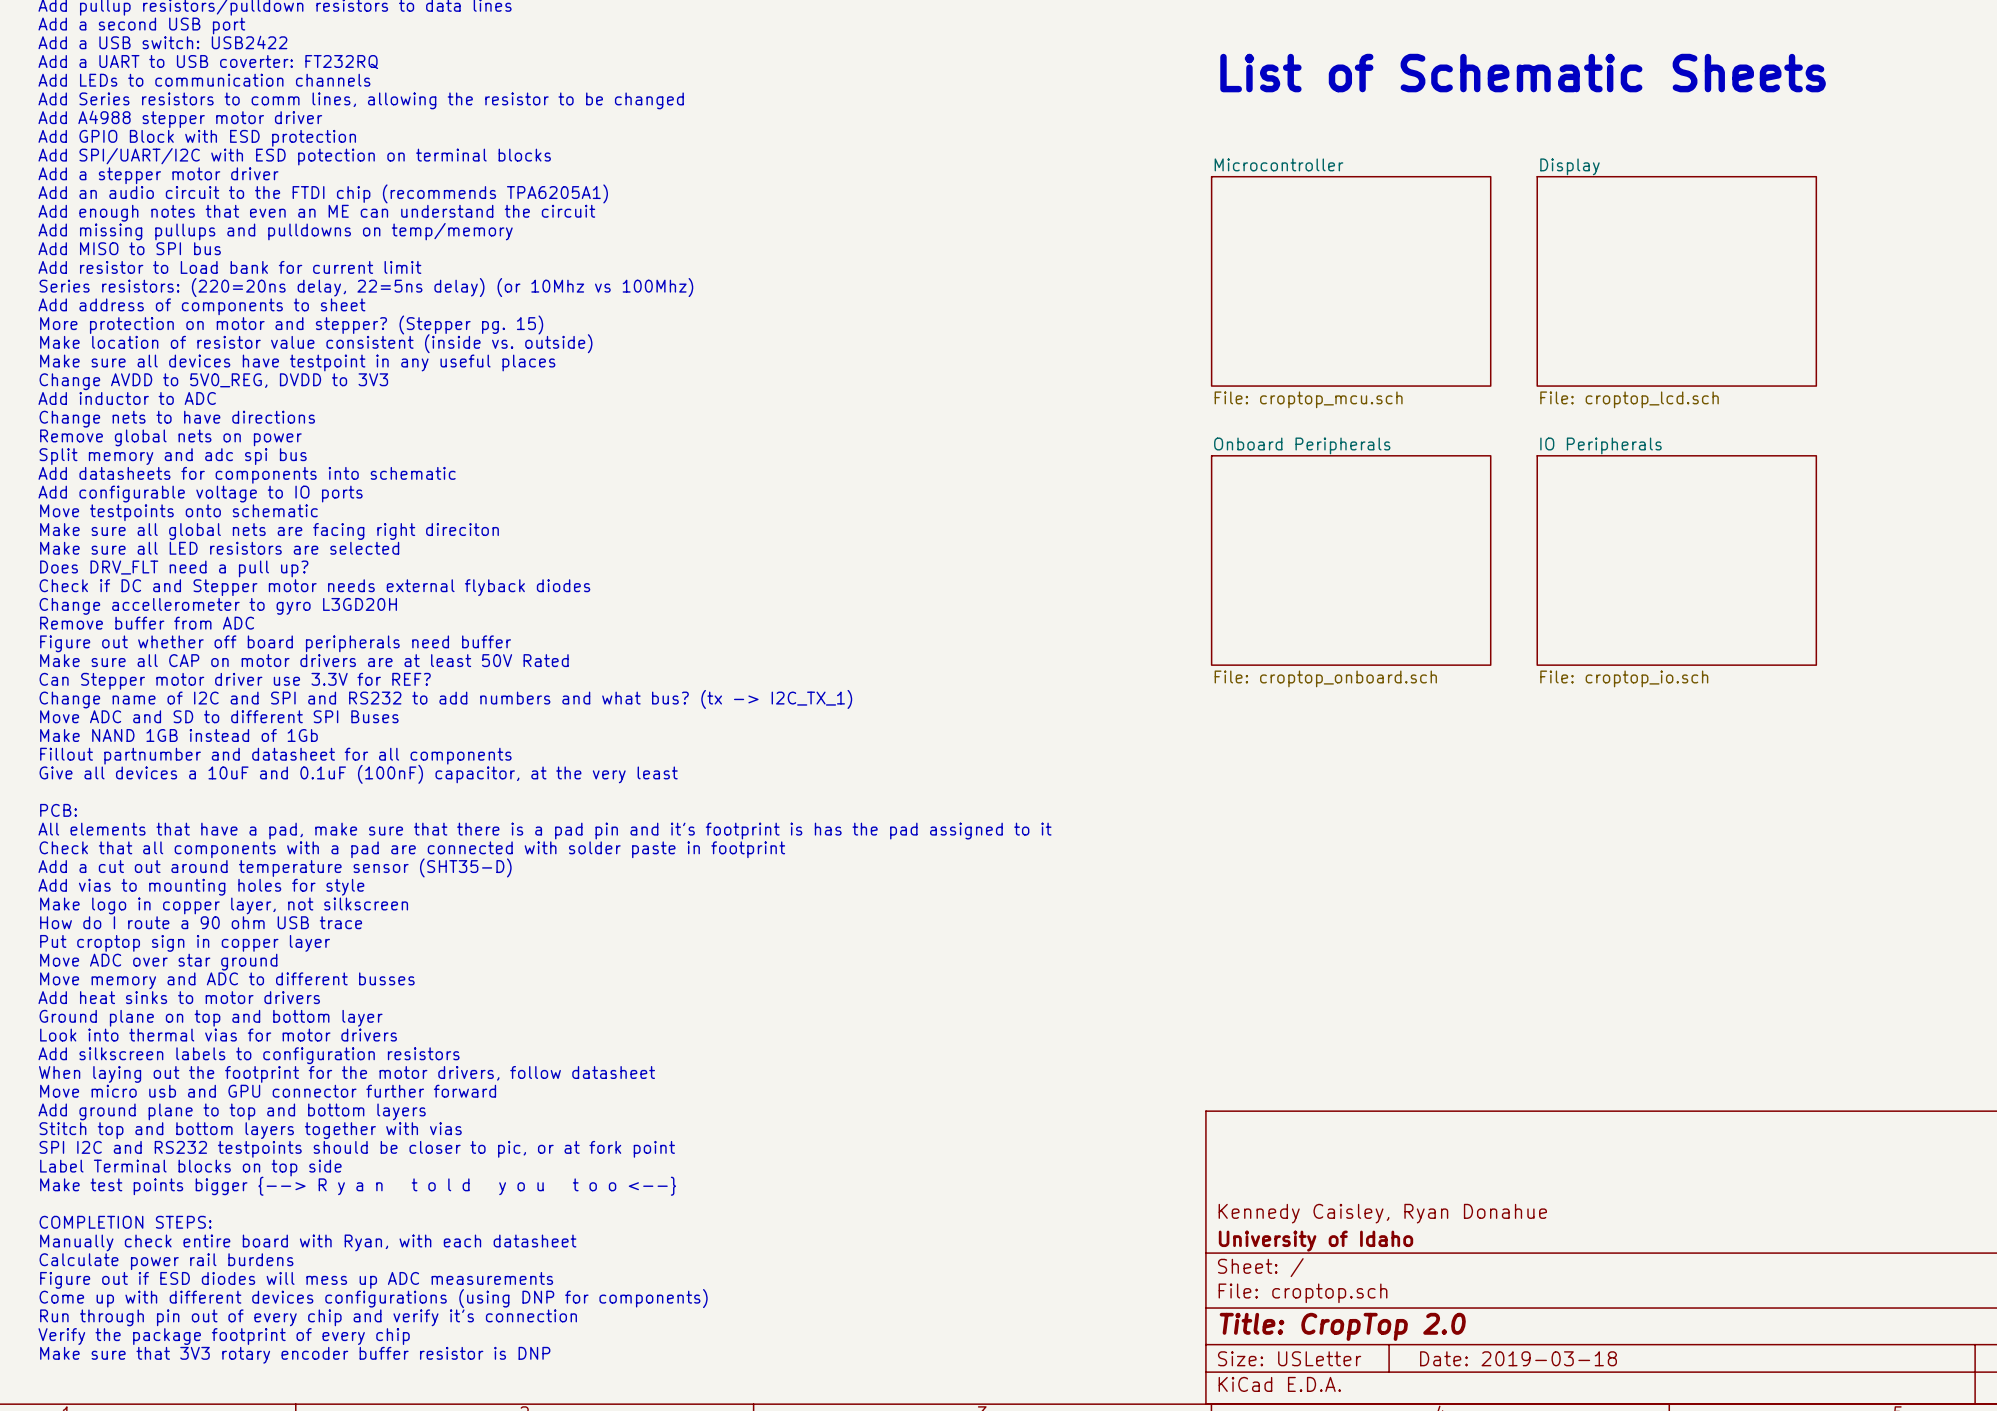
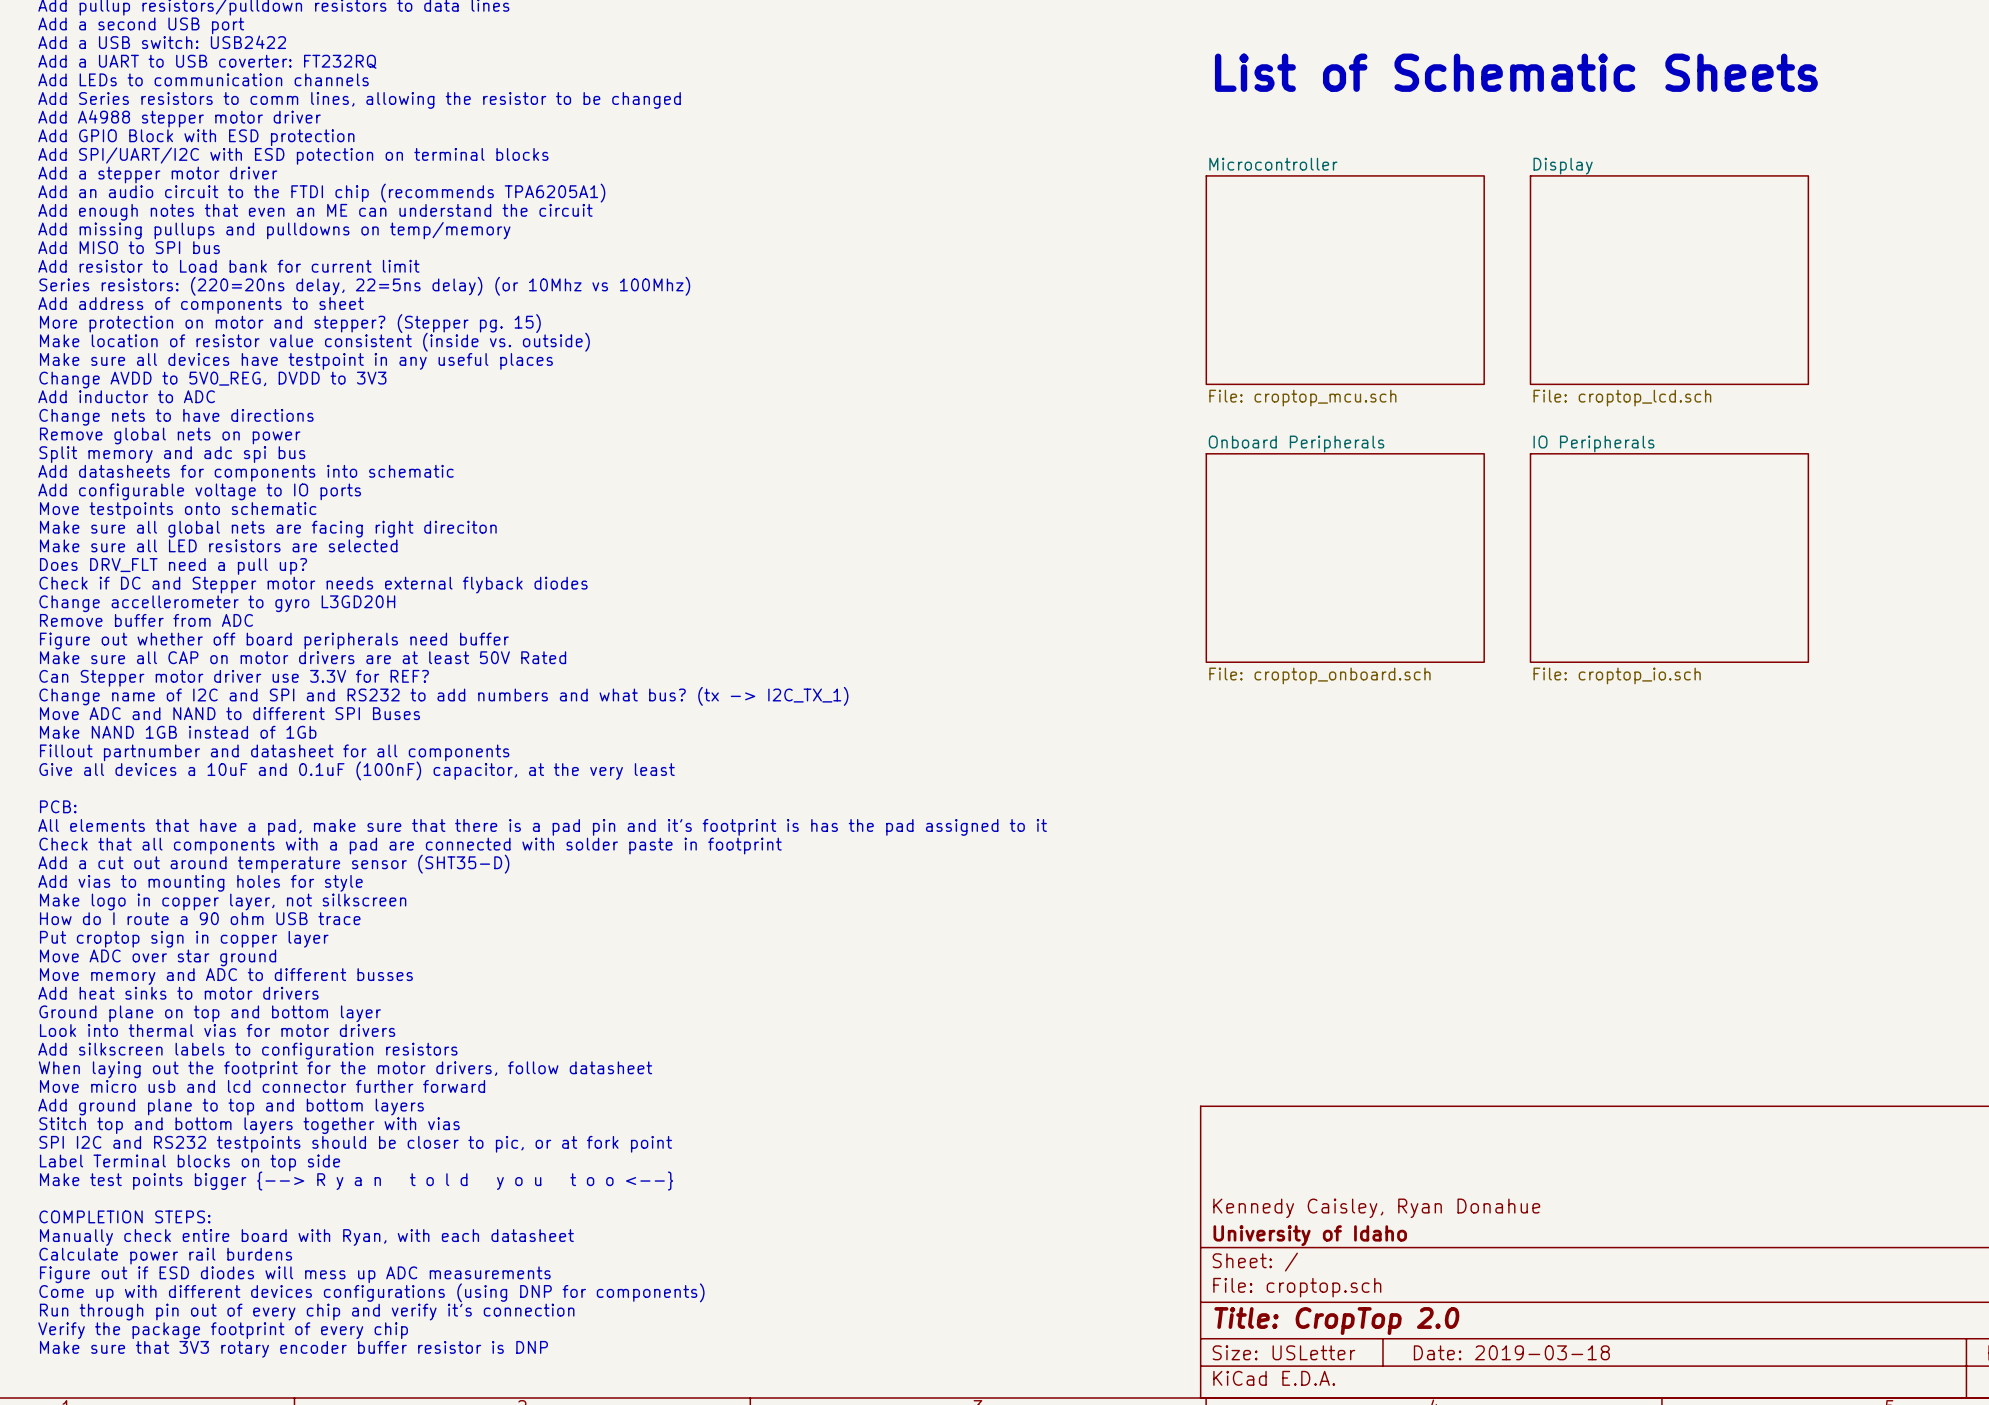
text: Move ADC and SD to different SPI Buses (219, 716) -> Move ADC and NAND to different SPI Buses (229, 713)
text: Move micro usb and GPU connector further forward (268, 1091) -> Move micro usb and lcd connector further forward (262, 1086)

